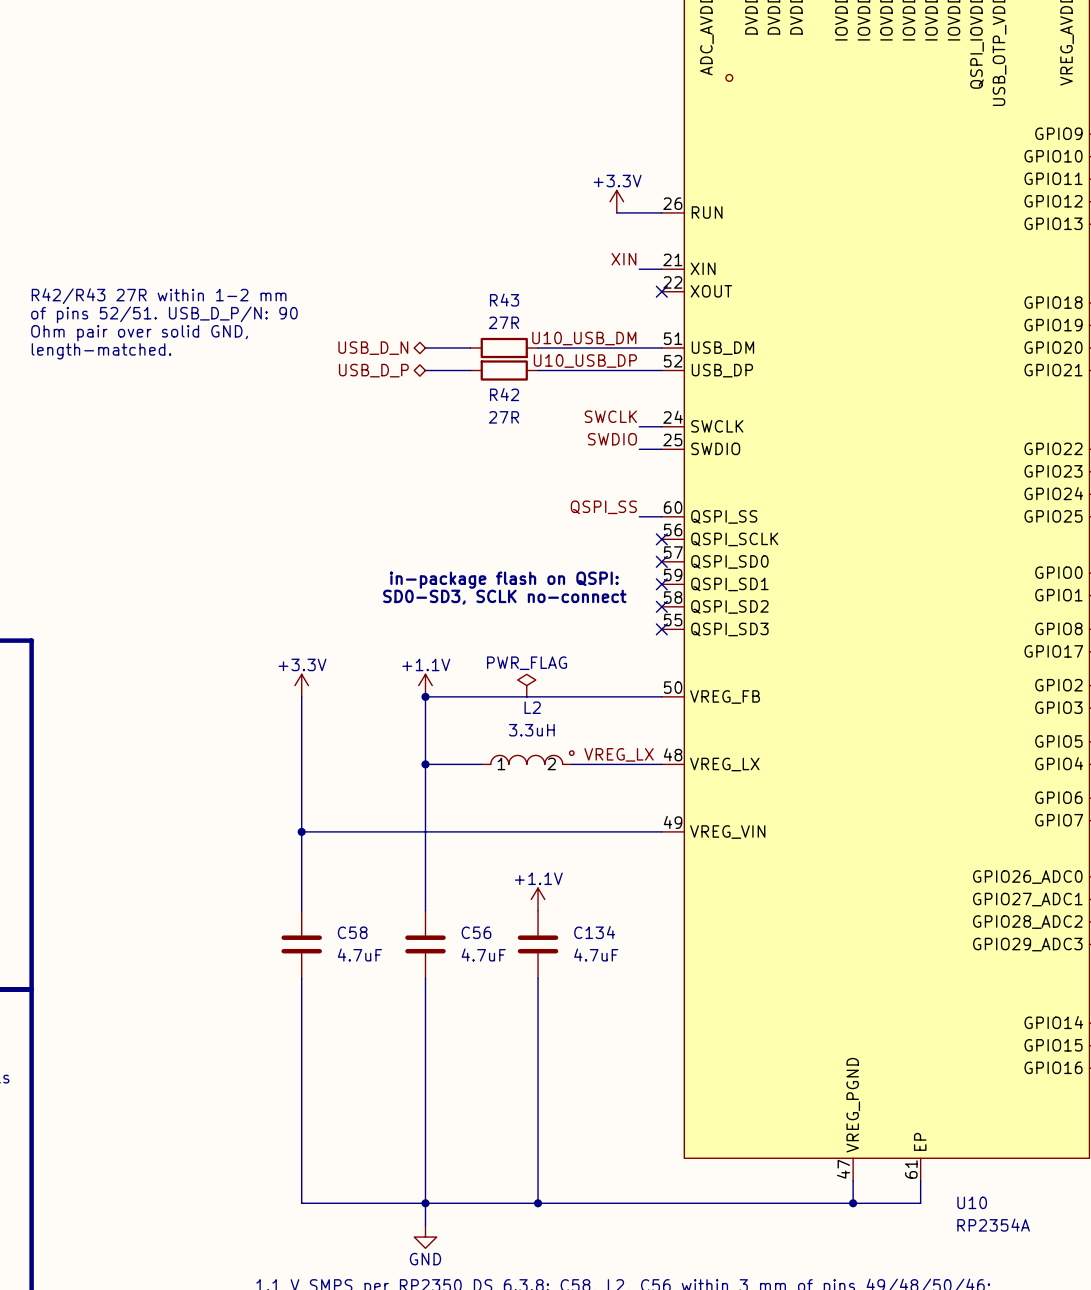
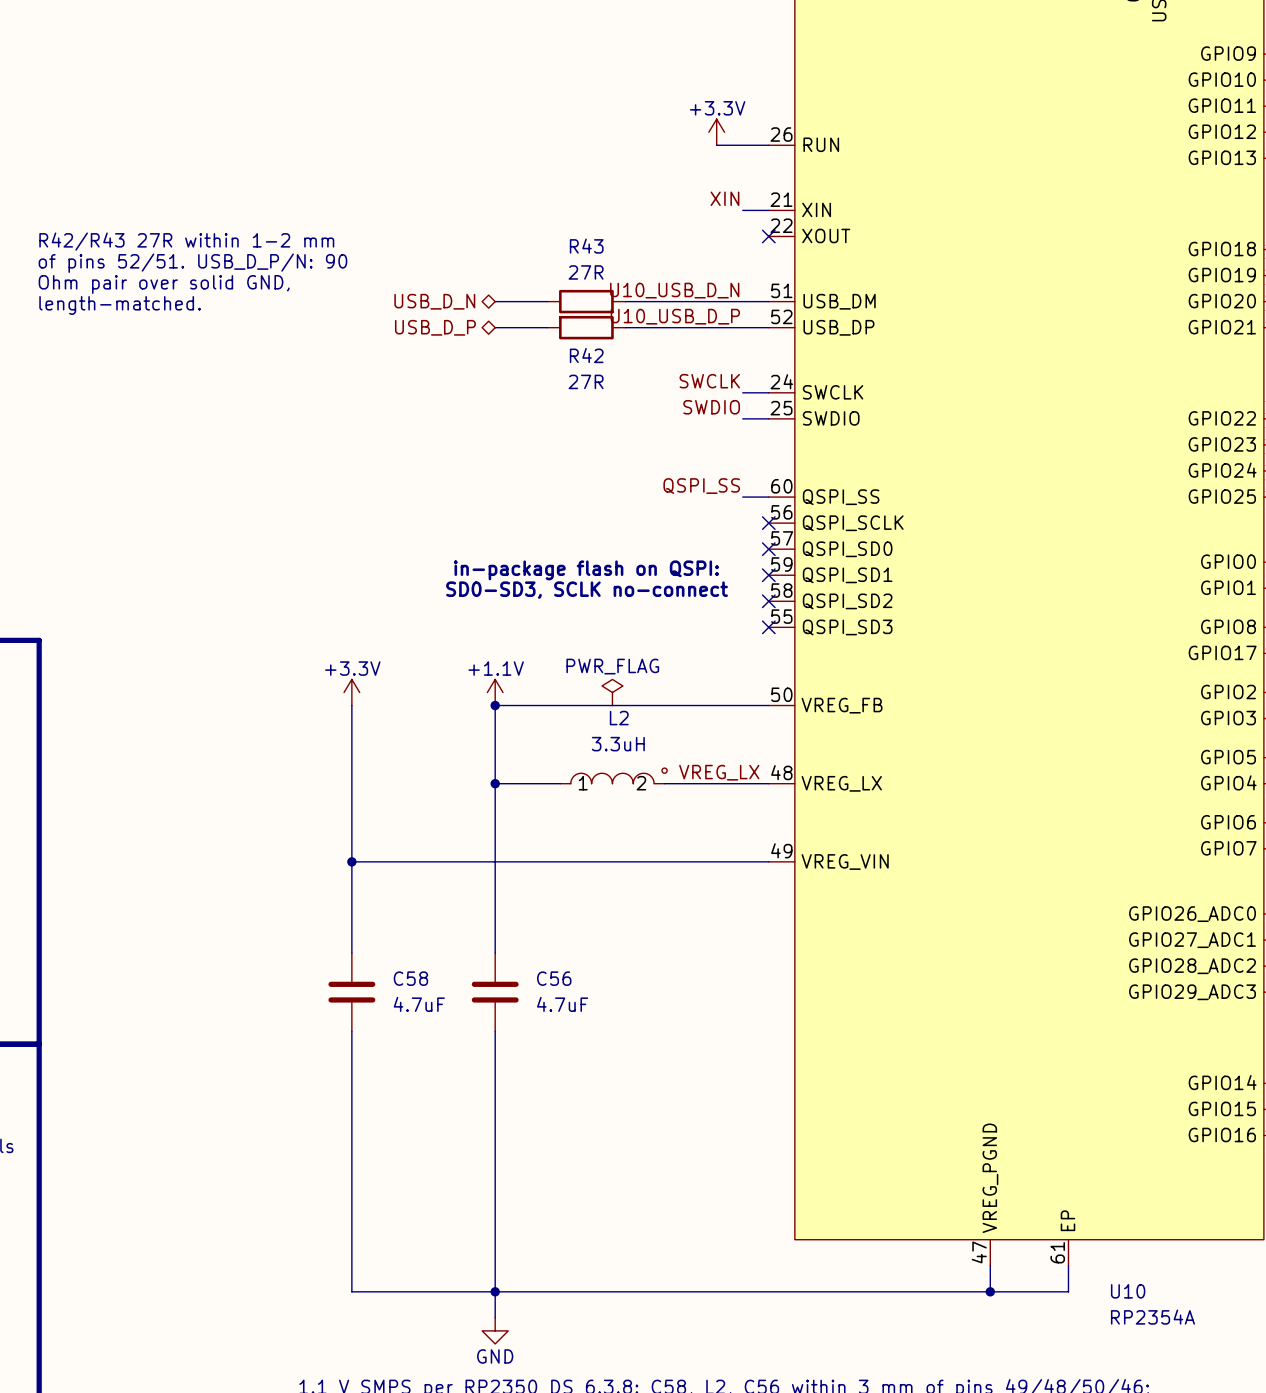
label: U10_USB_DM (584, 338) -> U10_USB_D_N (674, 290)
label: U10_USB_DP (585, 361) -> U10_USB_D_P (675, 316)
power symbol: +1.1V (538, 899) -> none
C134: 4.7uF (538, 944) -> none
wire: (538, 978) (538, 1203) -> none
junction: (538, 1203) -> none

